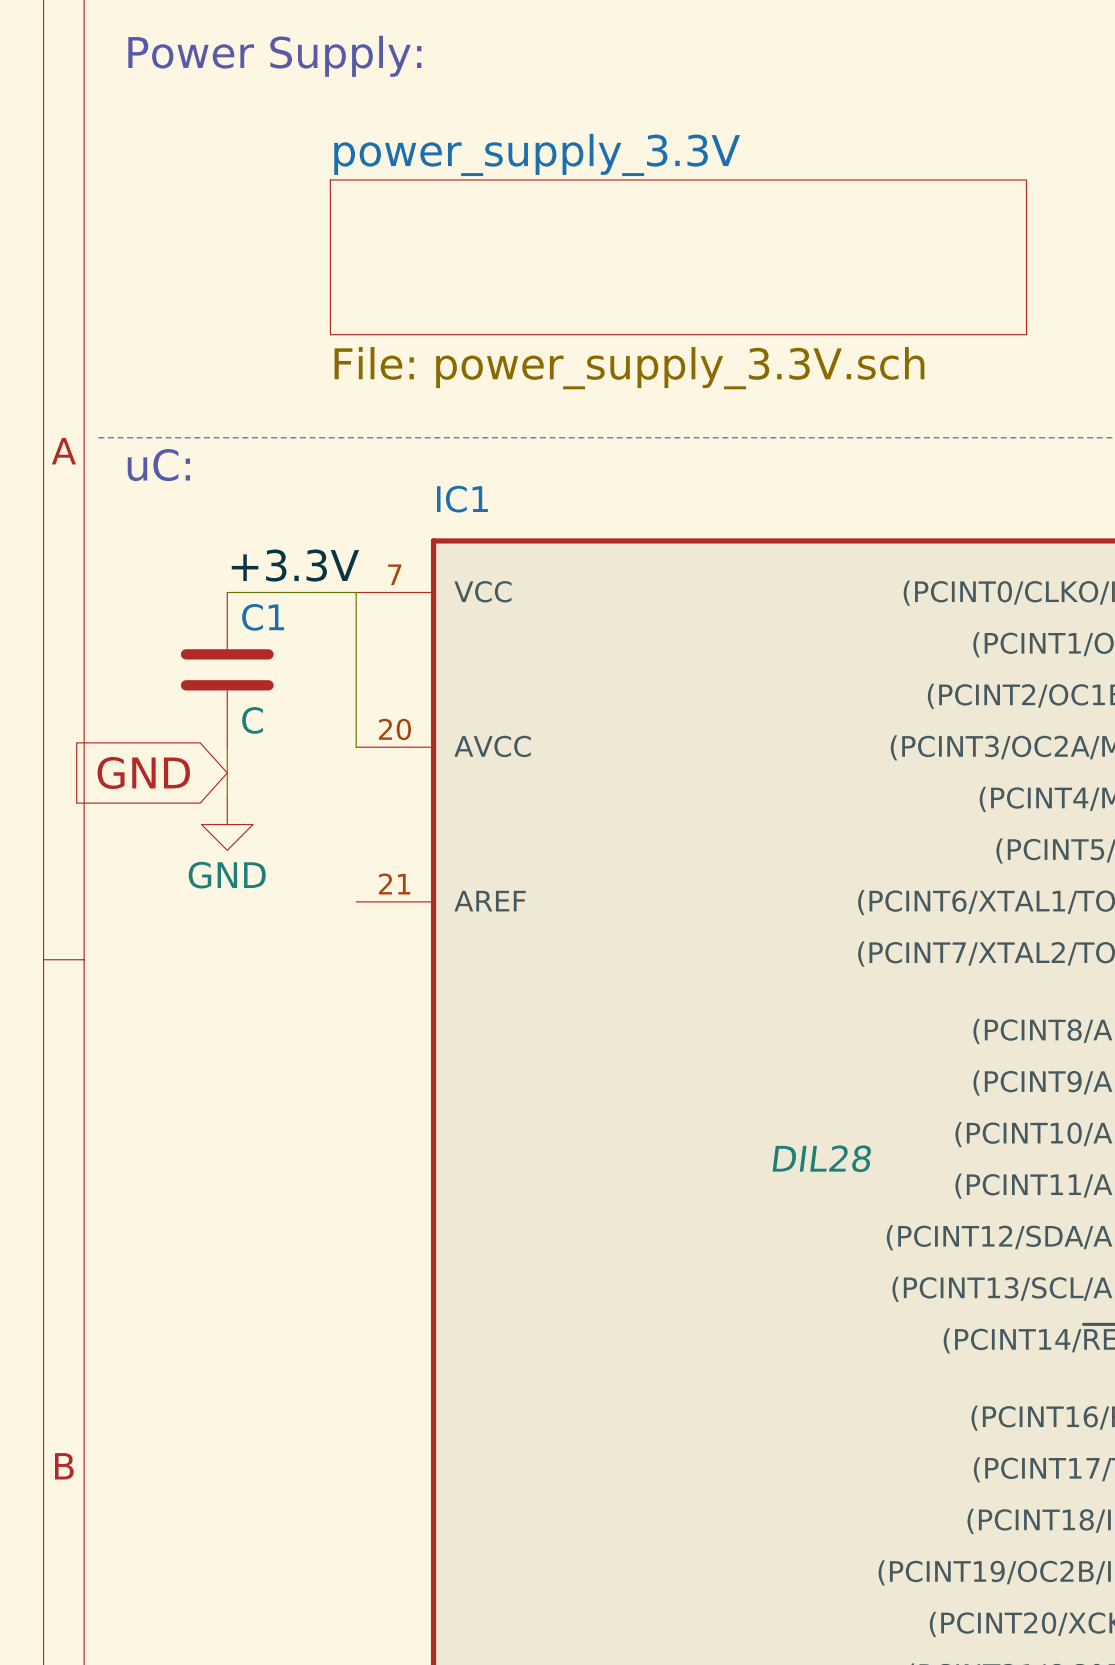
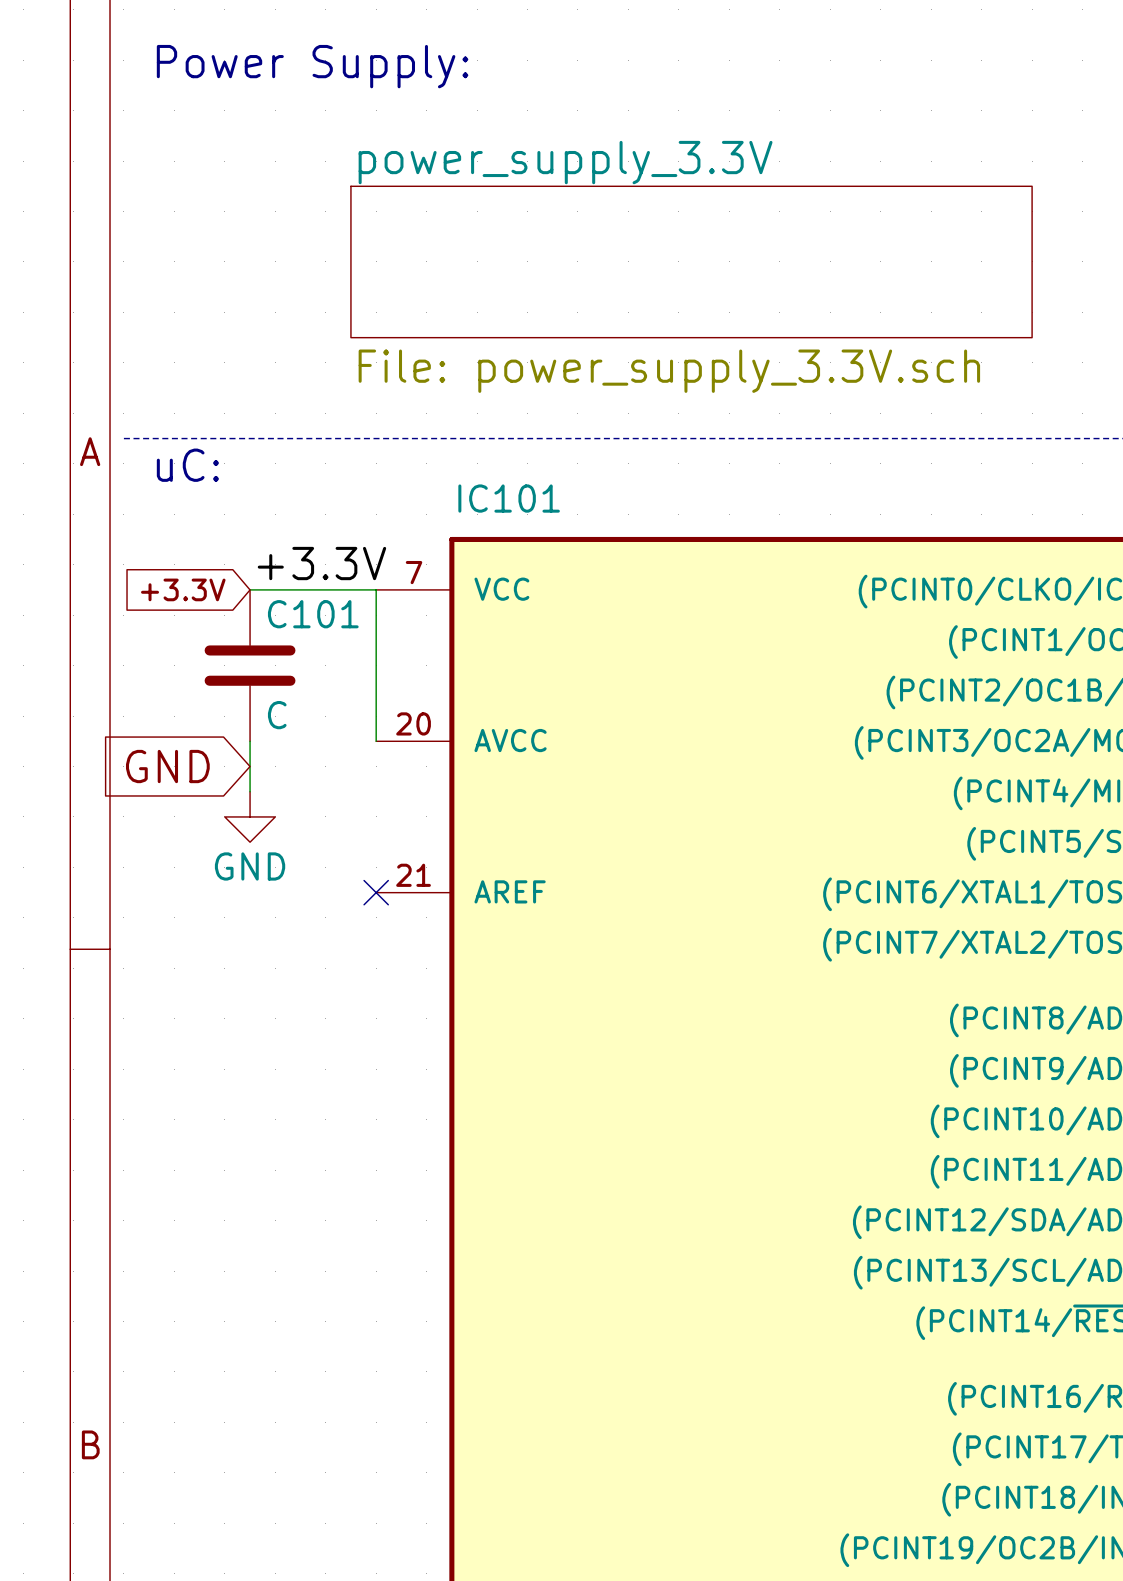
IC1 name: IC1 (462, 499) -> IC101 (509, 498)
global label: none -> +3.3V (183, 589)
C1 name: C1 (263, 617) -> C101 (313, 614)
no-connect mark: none -> (376, 892)
IC1 text: DIL28 (821, 1158) -> none

